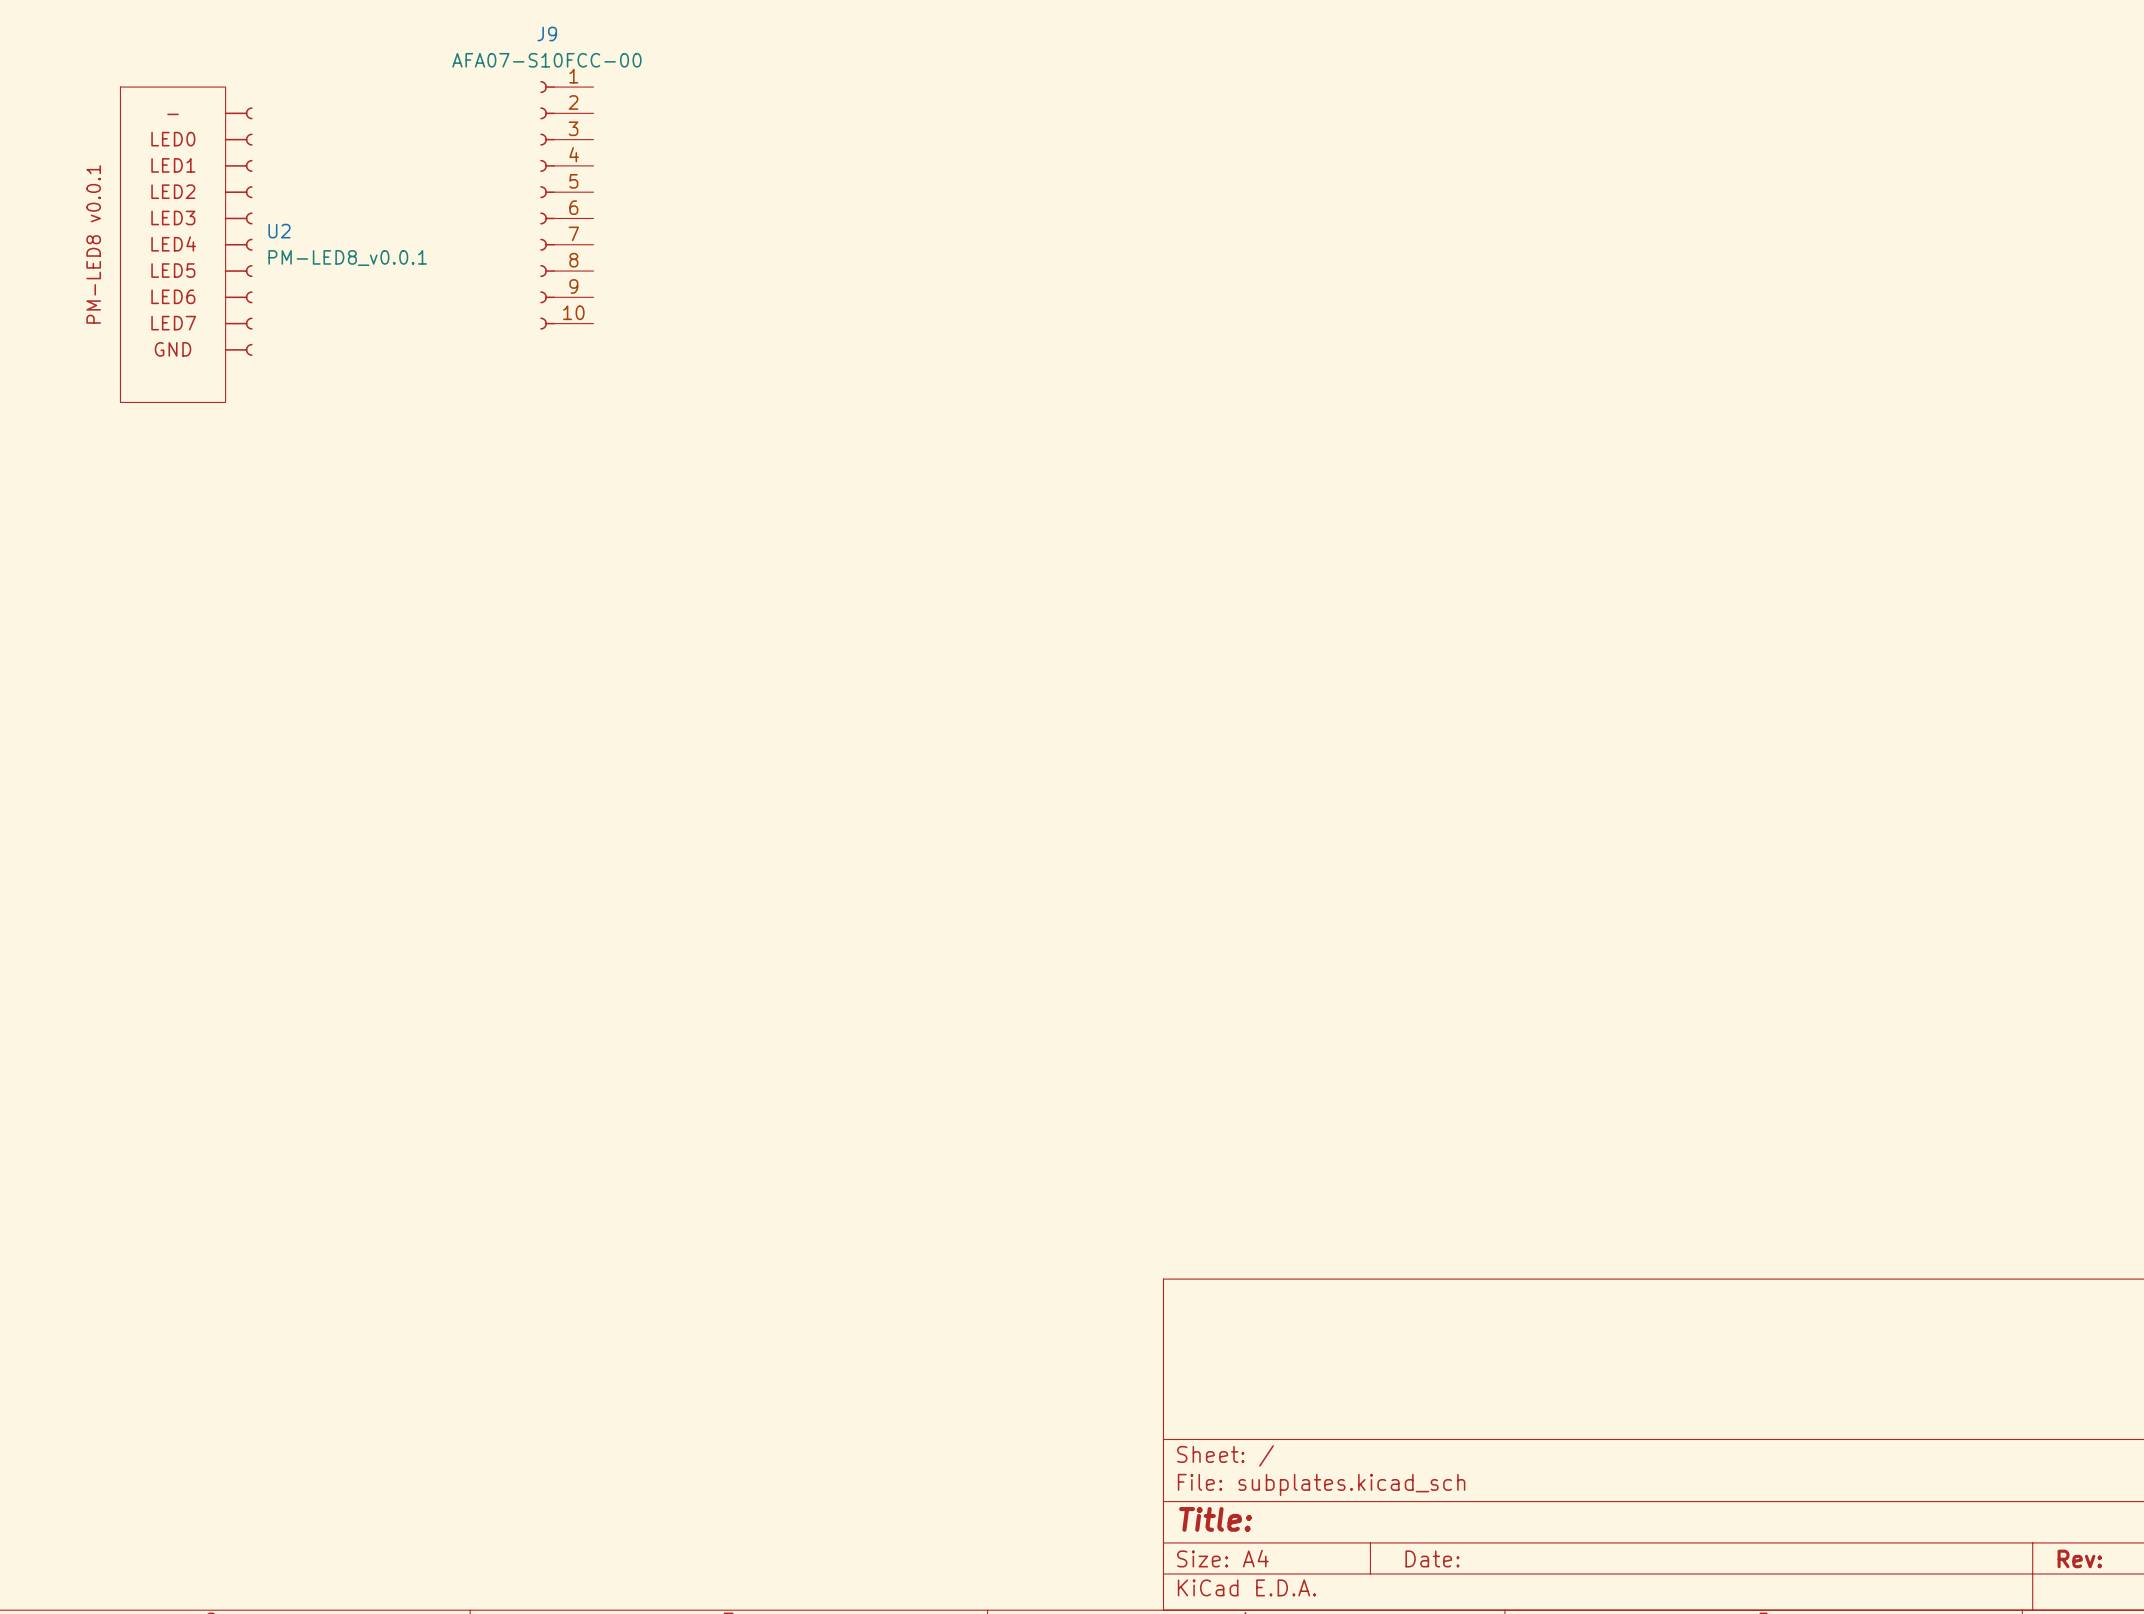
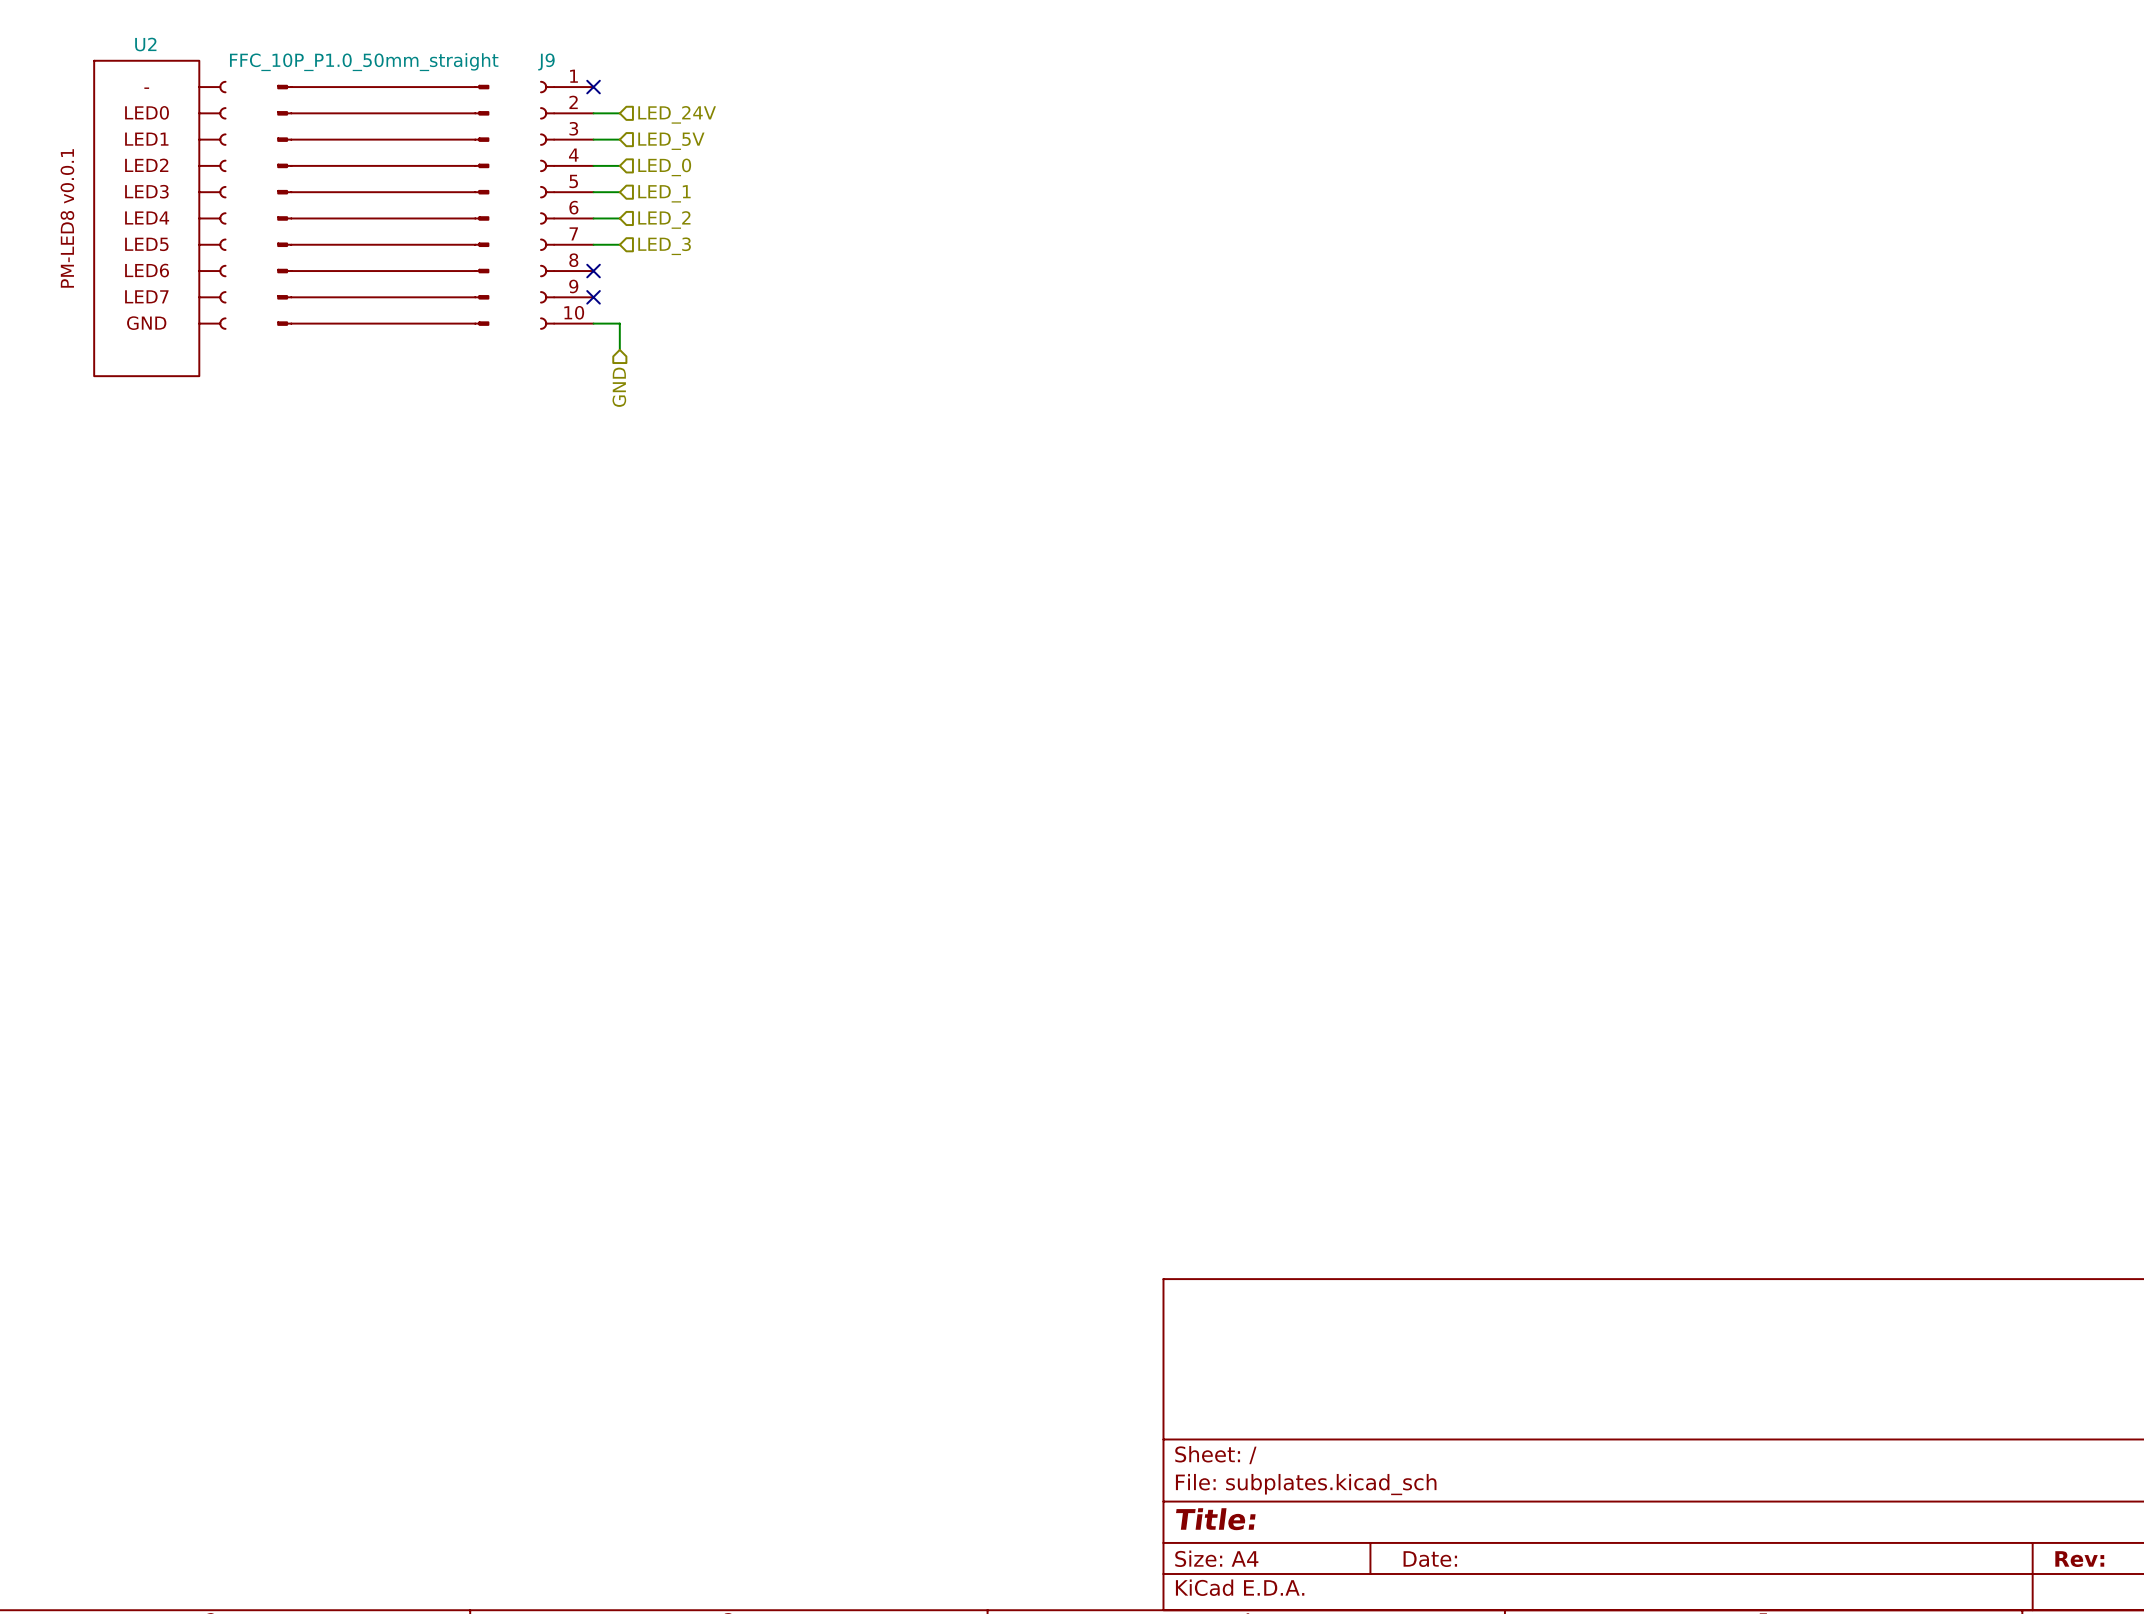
J9 name position: J9 (547, 34) -> J9 (546, 61)
J9 value: AFA07-S10FCC-00 (546, 60) -> none
no-connect mark: none -> (593, 87)
wire: none -> (593, 113) (619, 113)
hierarchical label: none -> LED_24V (677, 114)
wire: none -> (593, 139) (619, 139)
hierarchical label: none -> LED_5V (671, 141)
wire: none -> (593, 165) (619, 165)
hierarchical label: none -> LED_0 (664, 167)
wire: none -> (593, 192) (619, 192)
hierarchical label: none -> LED_1 (664, 193)
part: none -> FFC_10P_P1.0_50mm_straight (383, 205)
wire: none -> (593, 218) (619, 218)
hierarchical label: none -> LED_2 (664, 219)
U2 name position: U2 (279, 231) -> U2 (145, 44)
U2 position: (186, 244) -> (160, 218)
wire: none -> (593, 244) (619, 244)
hierarchical label: none -> LED_3 (664, 246)
U2 value: PM-LED8_v0.0.1 (347, 258) -> none
no-connect mark: none -> (593, 271)
no-connect mark: none -> (593, 297)
wire: none -> (593, 323) (619, 323) (619, 349)
hierarchical label: none -> GND (619, 387)

